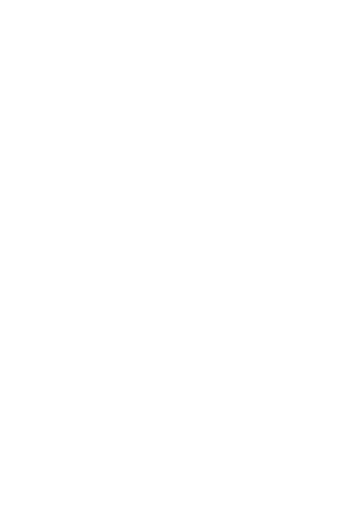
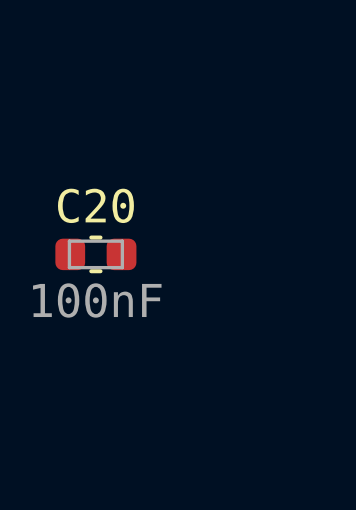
C20: none -> 100nF (95, 254)

